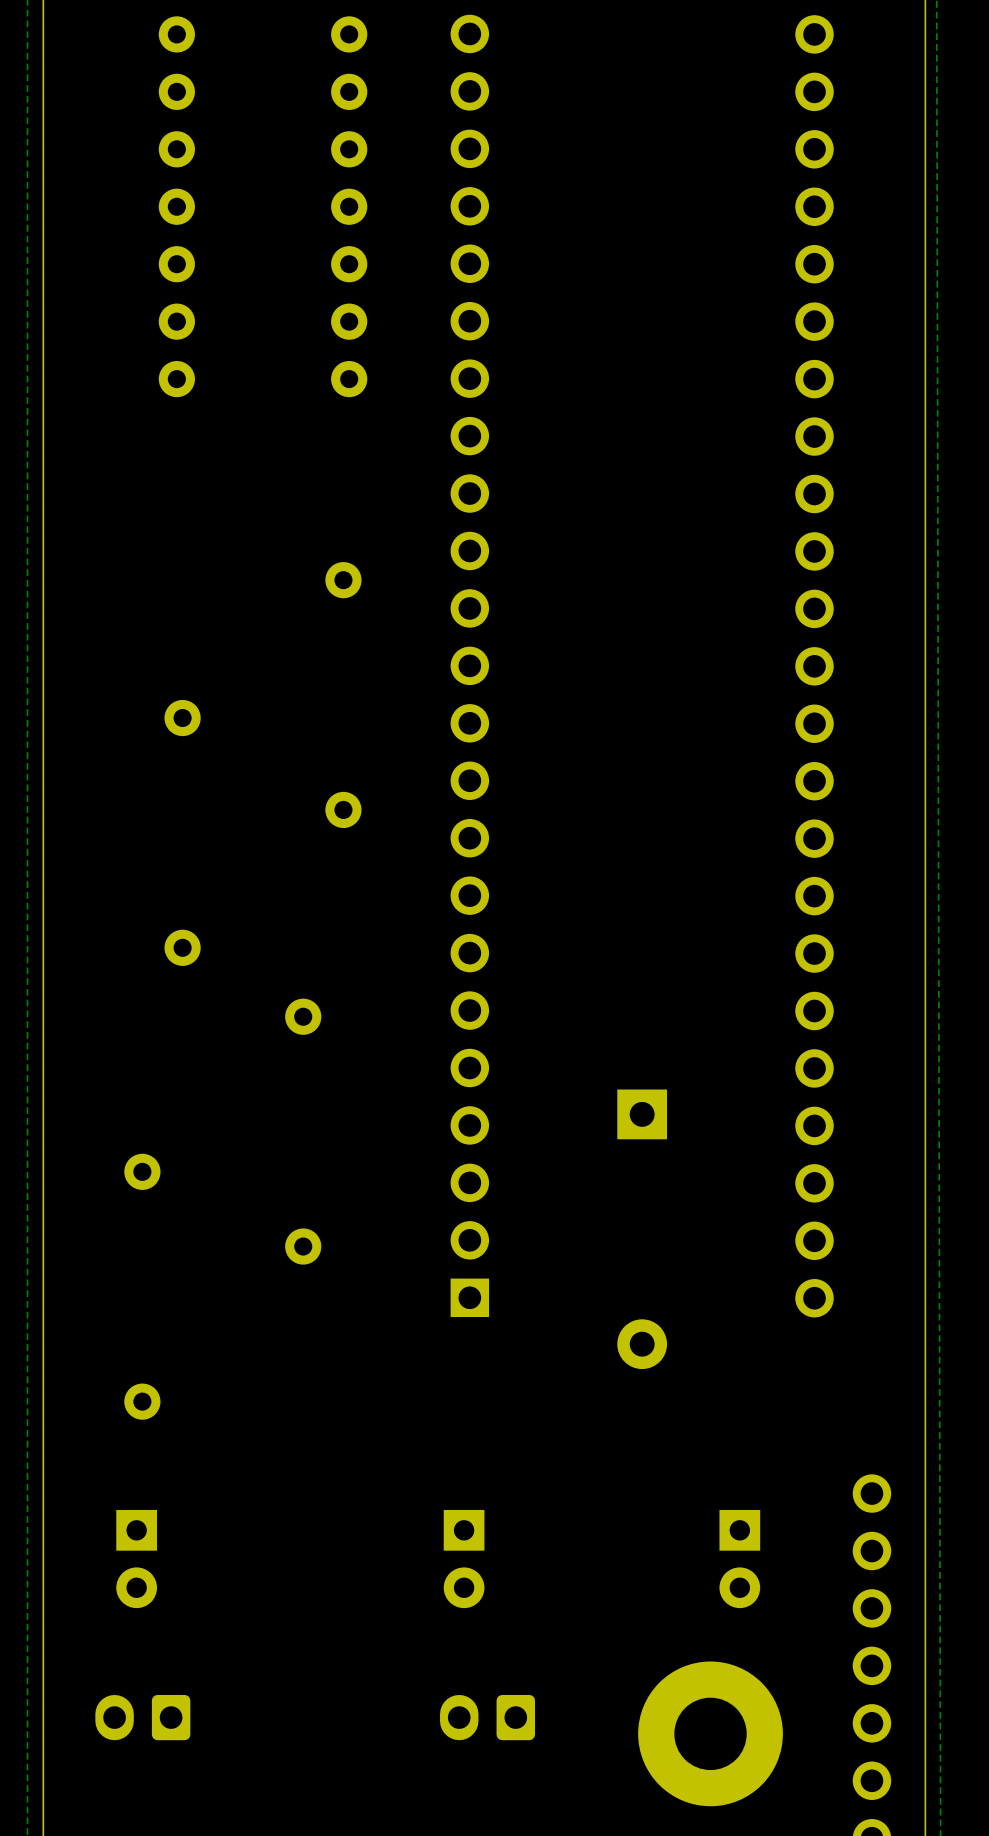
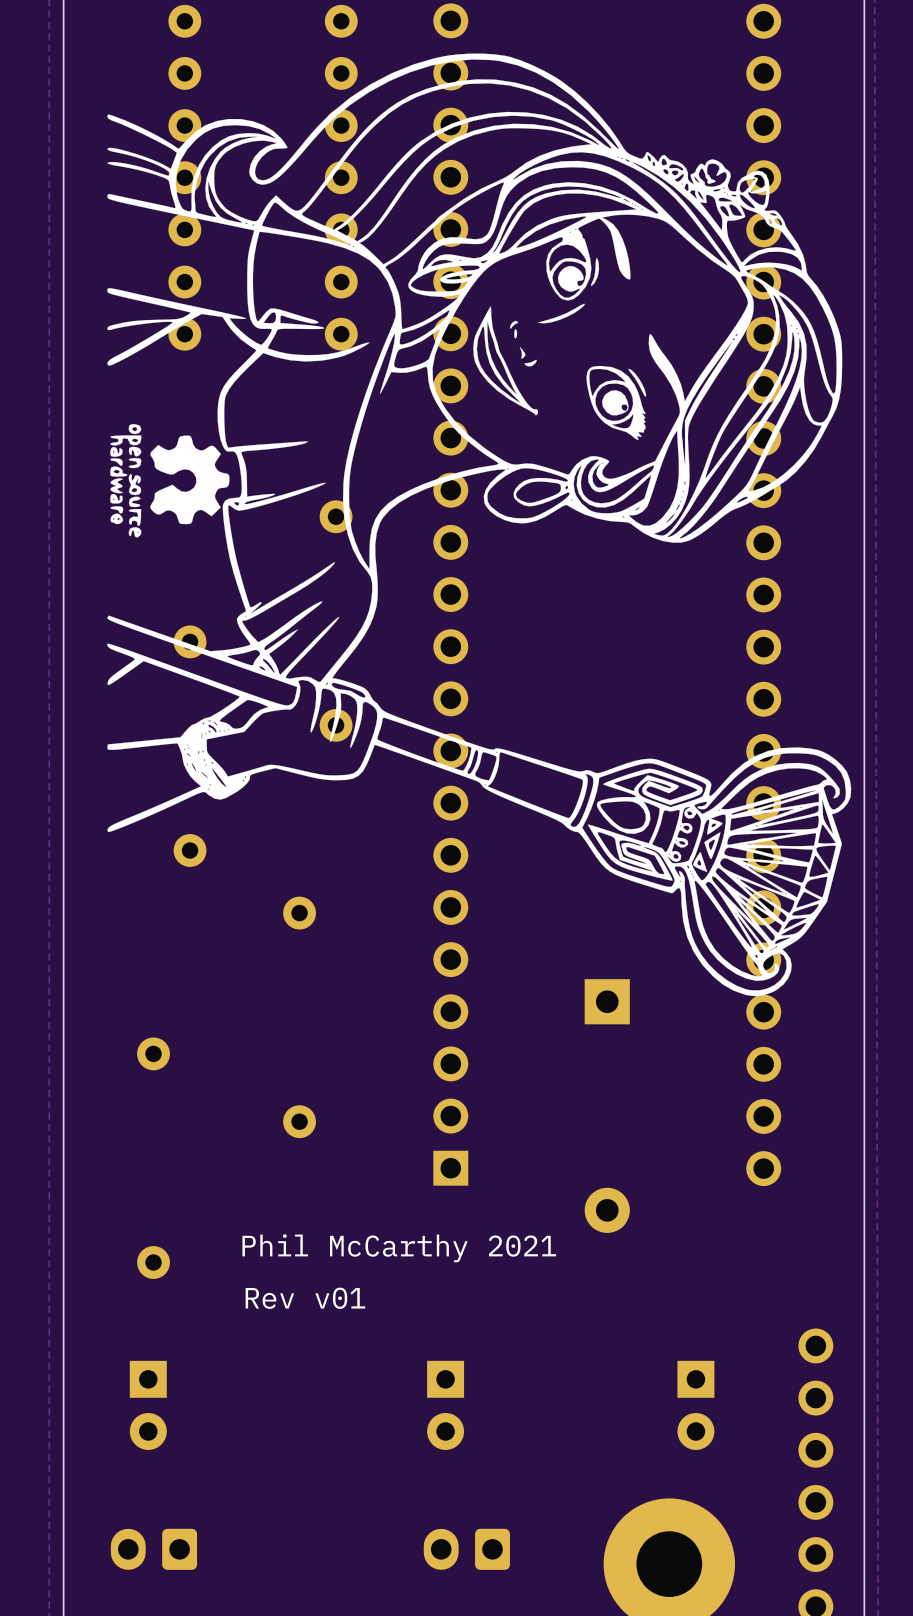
drawing: none -> [107, 53, 852, 997]
text: none -> Phil McCarthy 2021 (399, 1248)
text: none -> Rev v01 (305, 1298)

